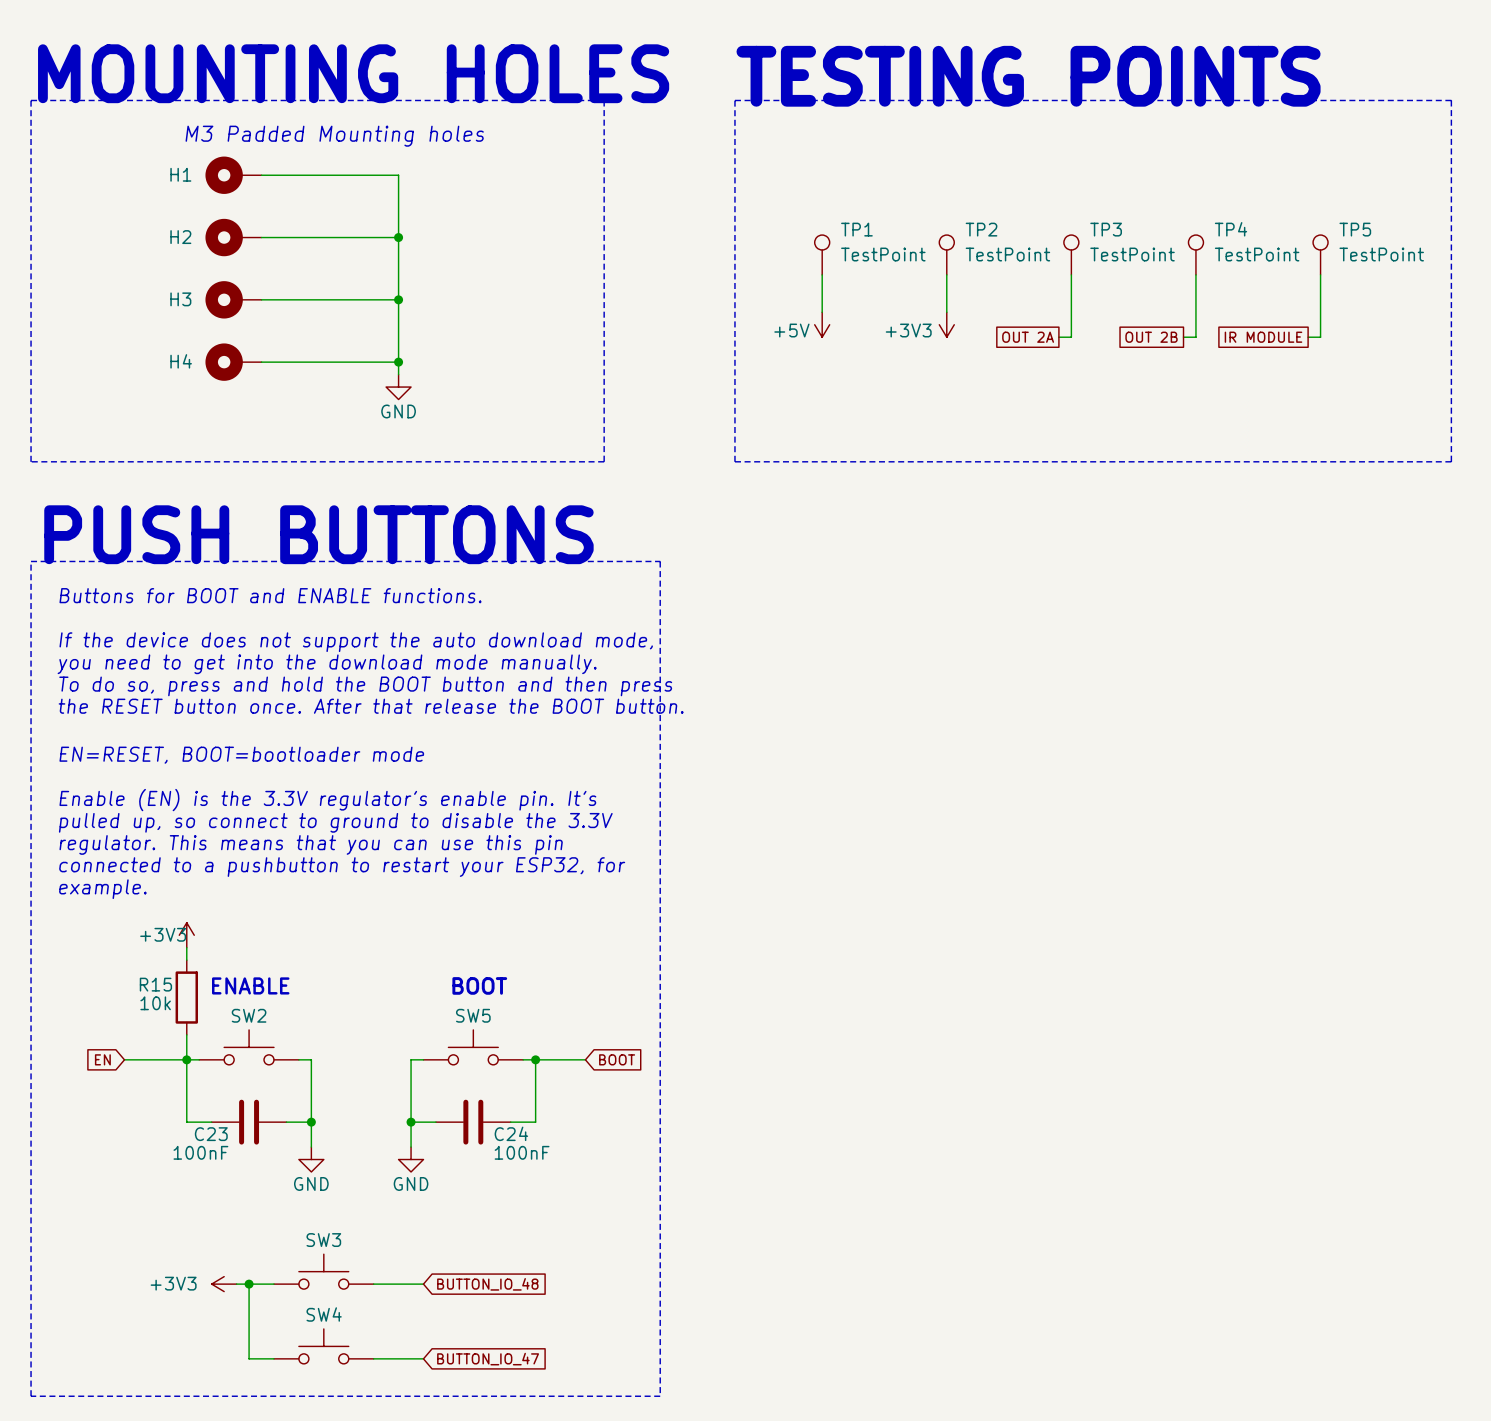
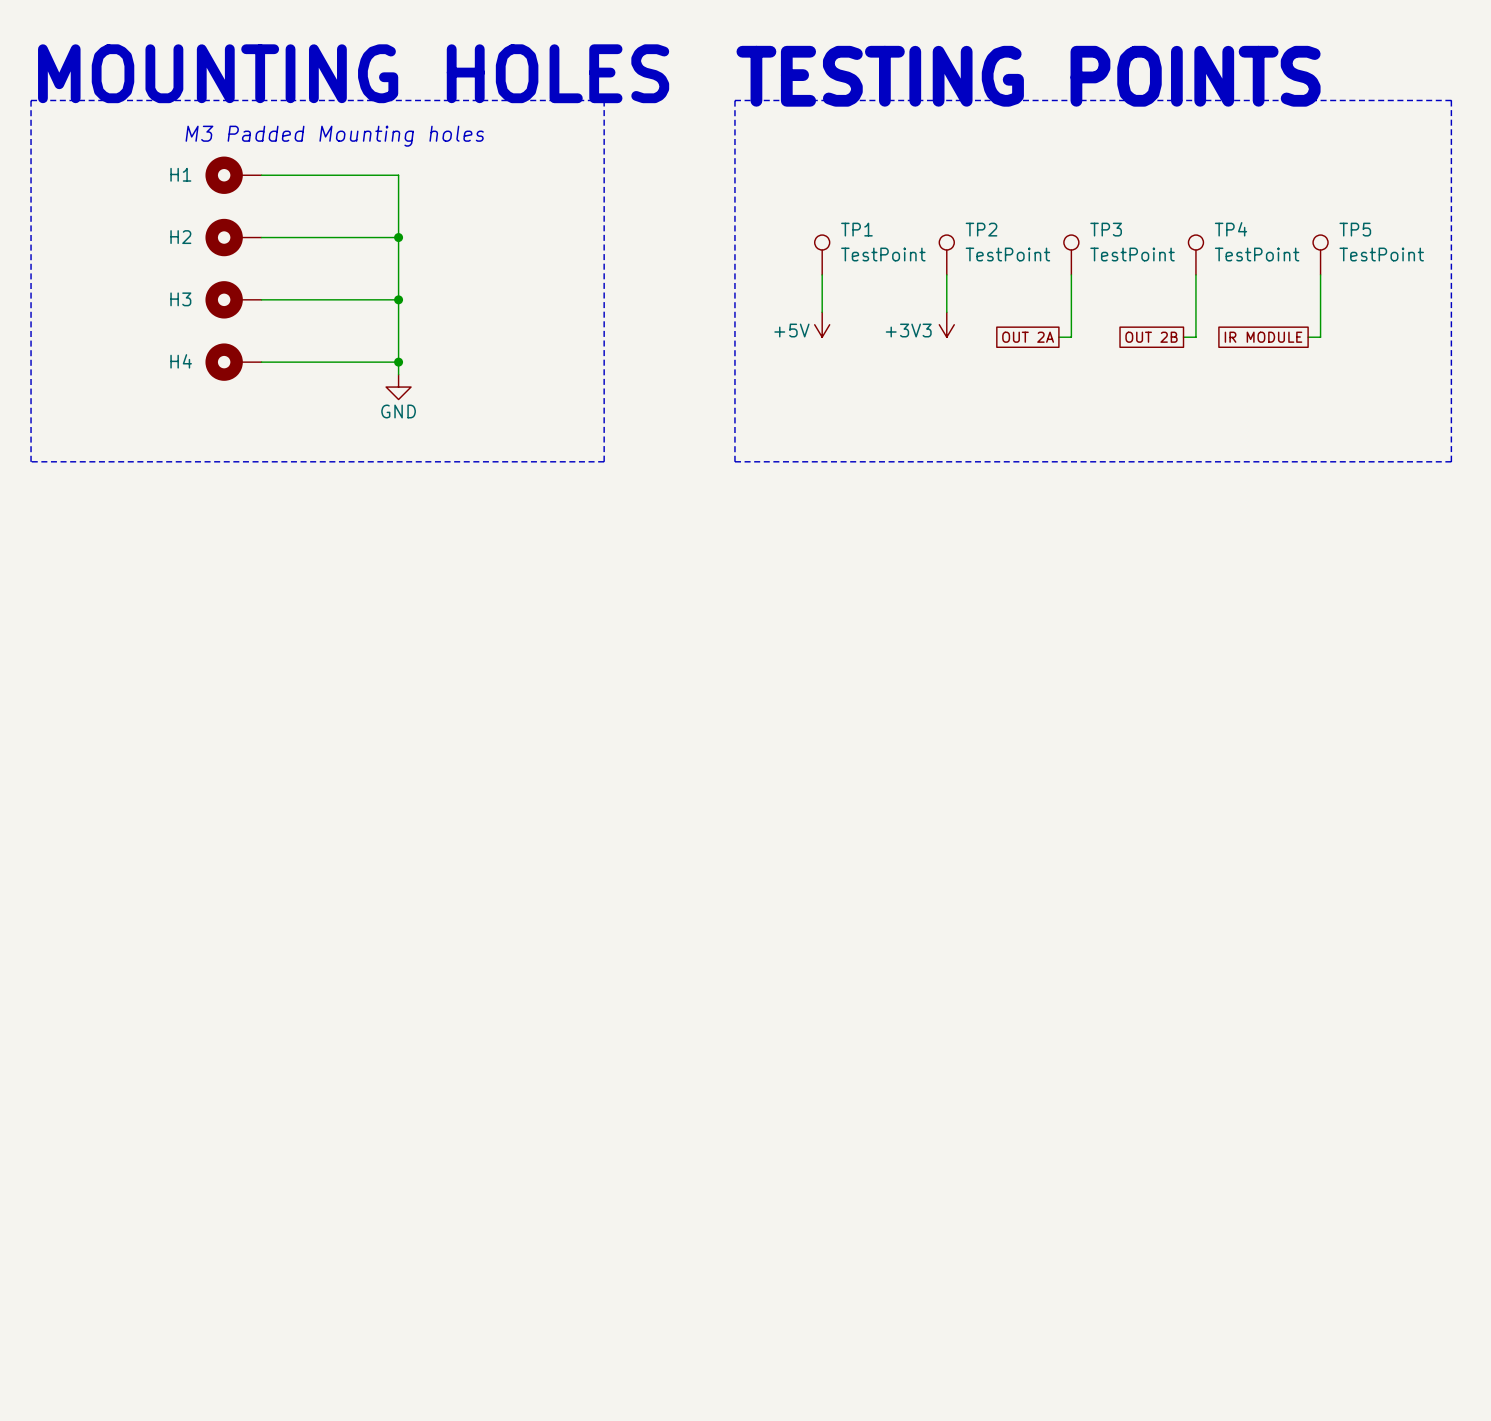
text: PUSH BUTTONS (318, 534) -> none
line: (31, 561) (660, 561) (660, 1396) (31, 1396) (31, 561) -> none
text: Buttons for BOOT and ENABLE functions. (270, 595) -> none
text: If the device does not support the auto download mode, (356, 642) -> none
text: you need to get into the download mode manually. (327, 664) -> none
text: To do so, press and hold the BOOT button and then press (365, 686) -> none
text: the RESET button once. After that release the BOOT button. (371, 706) -> none
text: EN=RESET, BOOT=bootloader mode (241, 755) -> none
text: Enable (EN) is the 3.3V regulator's enable pin. It's (327, 800) -> none
text: pulled up, so connect to ground to disable the 3.3V (335, 822) -> none
text: regulator. This means that you can use this pin (311, 844) -> none
text: connected to a pushbutton to restart your ESP32, for (342, 867) -> none
text: example. (102, 889) -> none
power symbol: +3V3 (186, 935) -> none
wire: (186, 947) (186, 960) -> none
text: ENABLE (250, 985) -> none
text: BOOT (479, 985) -> none
R15: 10k (186, 997) -> none
wire: (186, 1034) (186, 1122) (211, 1122) -> none
SW2: (249, 1047) -> none
SW5: (473, 1047) -> none
global label: EN (102, 1059) -> none
wire: (124, 1059) (199, 1059) -> none
junction: (186, 1059) -> none
wire: (298, 1059) (311, 1059) (311, 1147) -> none
wire: (423, 1059) (411, 1059) (411, 1147) -> none
wire: (523, 1059) (585, 1059) -> none
wire: (535, 1059) (535, 1122) (510, 1122) -> none
junction: (535, 1059) -> none
global label: BOOT (617, 1059) -> none
C23: 100nF (249, 1122) -> none
wire: (286, 1122) (311, 1122) -> none
junction: (311, 1122) -> none
wire: (411, 1122) (435, 1122) -> none
junction: (411, 1122) -> none
C24: 100nF (473, 1122) -> none
power symbol: GND (311, 1159) -> none
power symbol: GND (411, 1159) -> none
SW3: (323, 1271) -> none
power symbol: +3V3 (224, 1284) -> none
wire: (236, 1284) (273, 1284) -> none
wire: (249, 1284) (249, 1358) (273, 1358) -> none
junction: (249, 1284) -> none
wire: (373, 1284) (423, 1284) -> none
global label: BUTTON_IO_48 (487, 1284) -> none
SW4: (323, 1346) -> none
wire: (373, 1358) (423, 1358) -> none
global label: BUTTON_IO_47 (488, 1359) -> none

